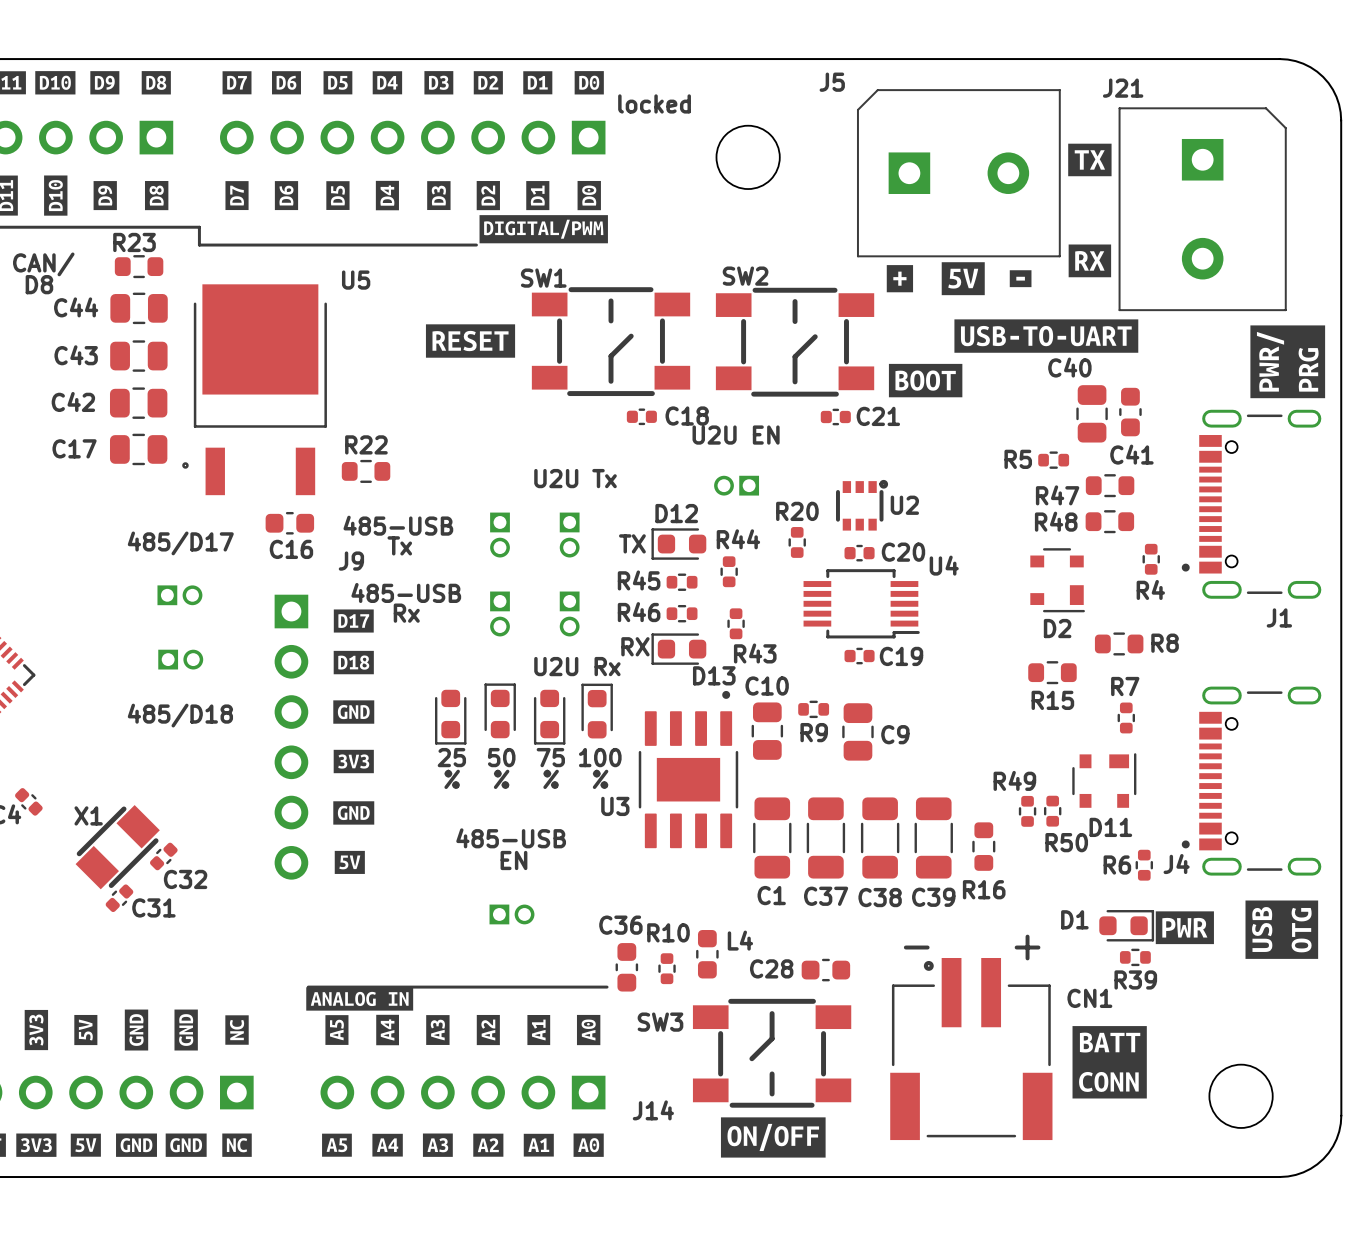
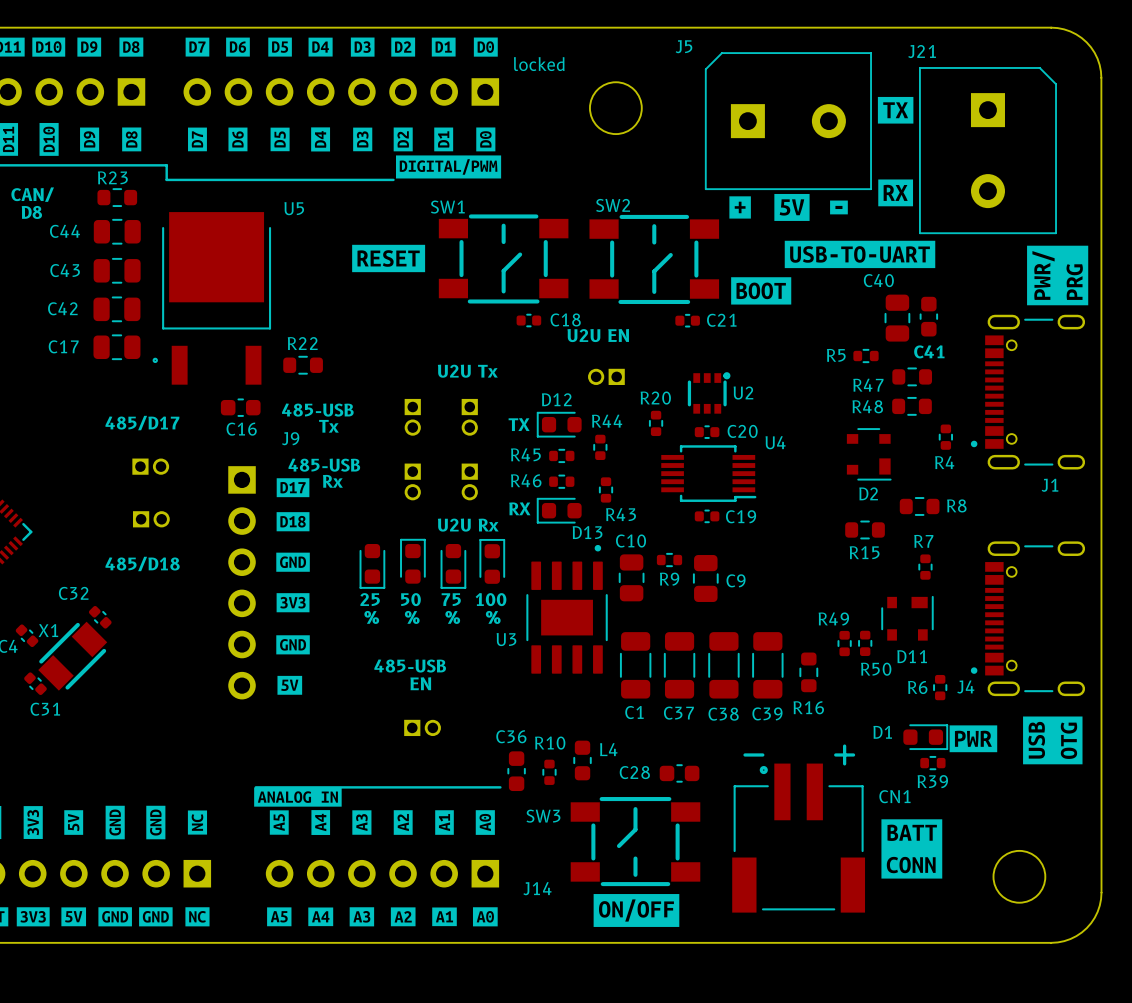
X1 position: (117, 847) -> (72, 656)
C32 rotation: 0° (163, 856) -> 90° clockwise (100, 617)
C32 position: (163, 856) -> (100, 617)
C32 name position: C32 (185, 879) -> C32 (73, 593)
C31 rotation: 0° (119, 898) -> 90° clockwise (35, 683)
C31 position: (119, 898) -> (35, 683)

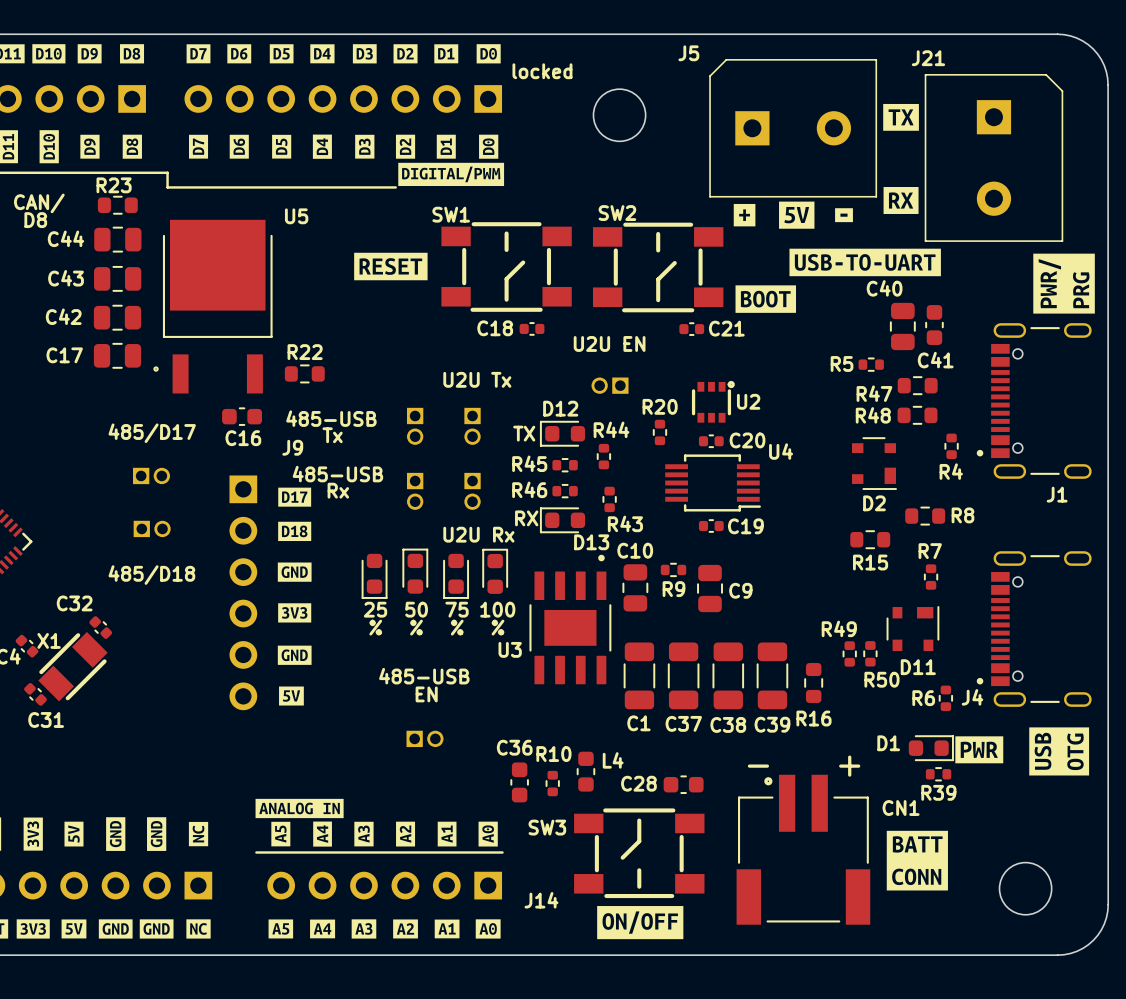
C18 name position: C18 (565, 319) -> C18 (495, 328)
line: (255, 787) (500, 787) -> (256, 852) (502, 852)

